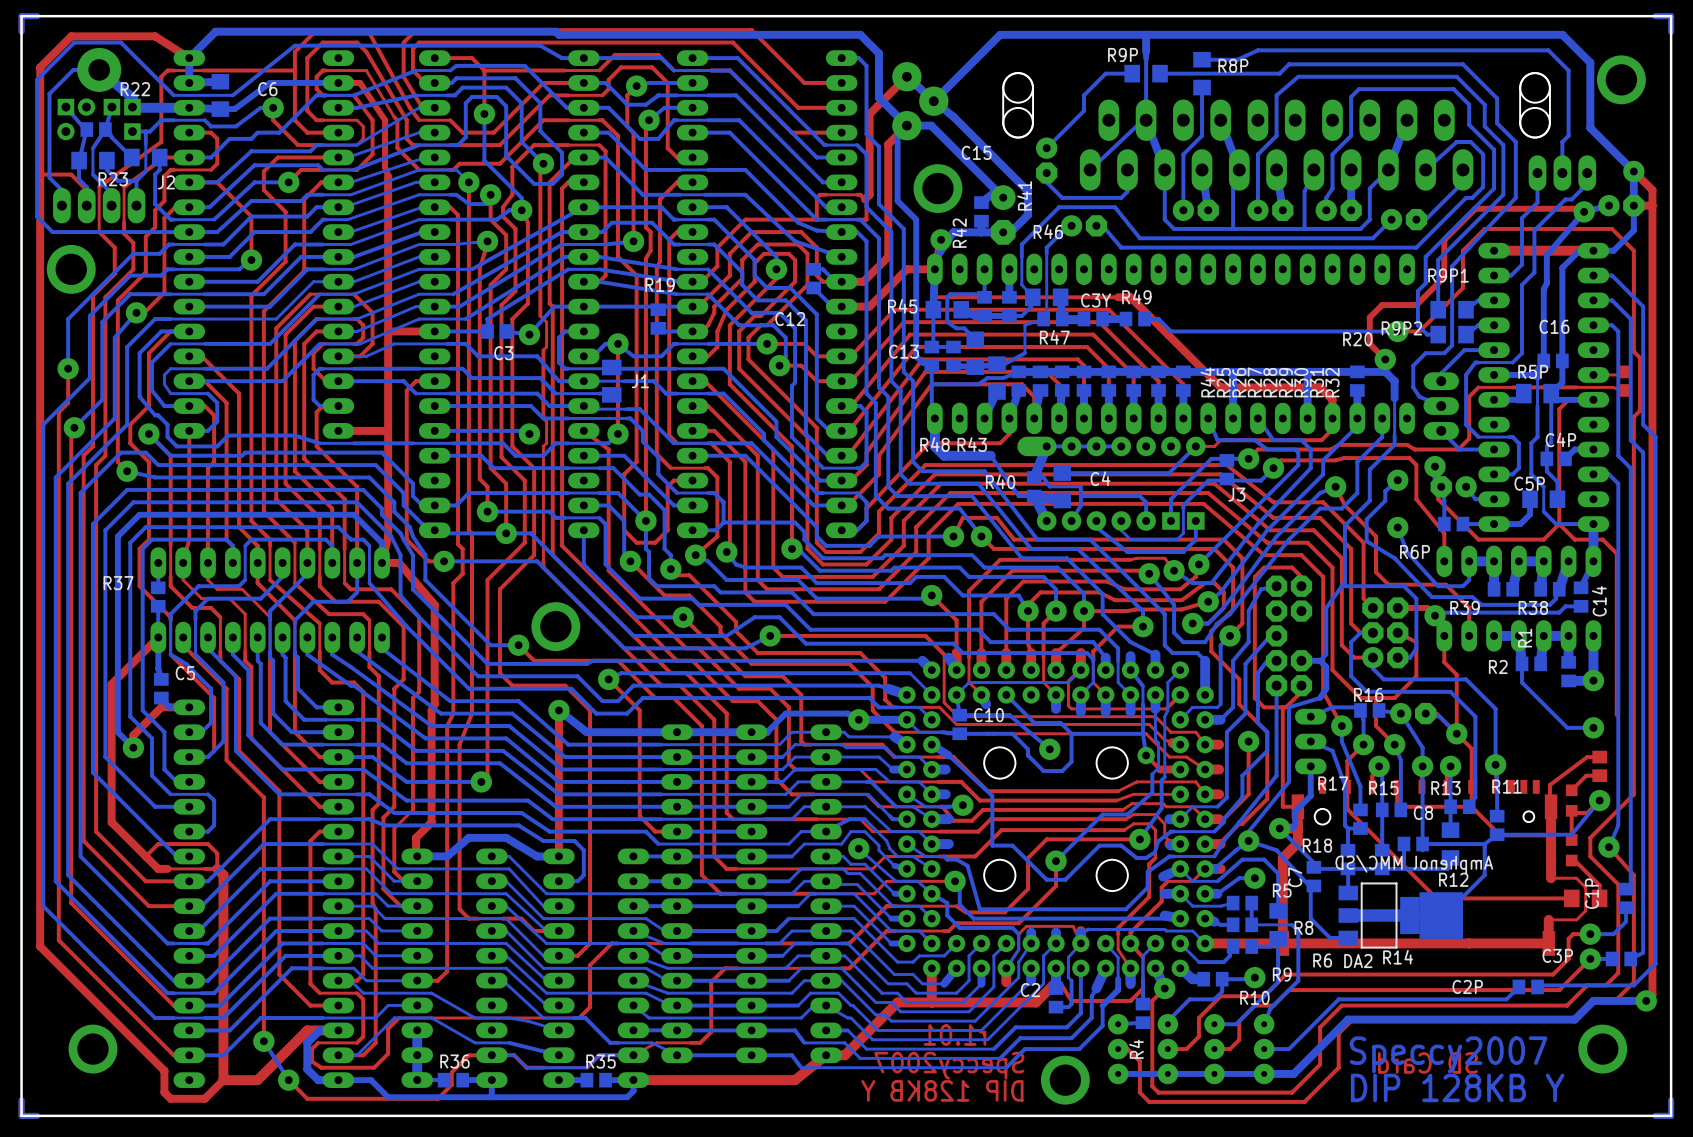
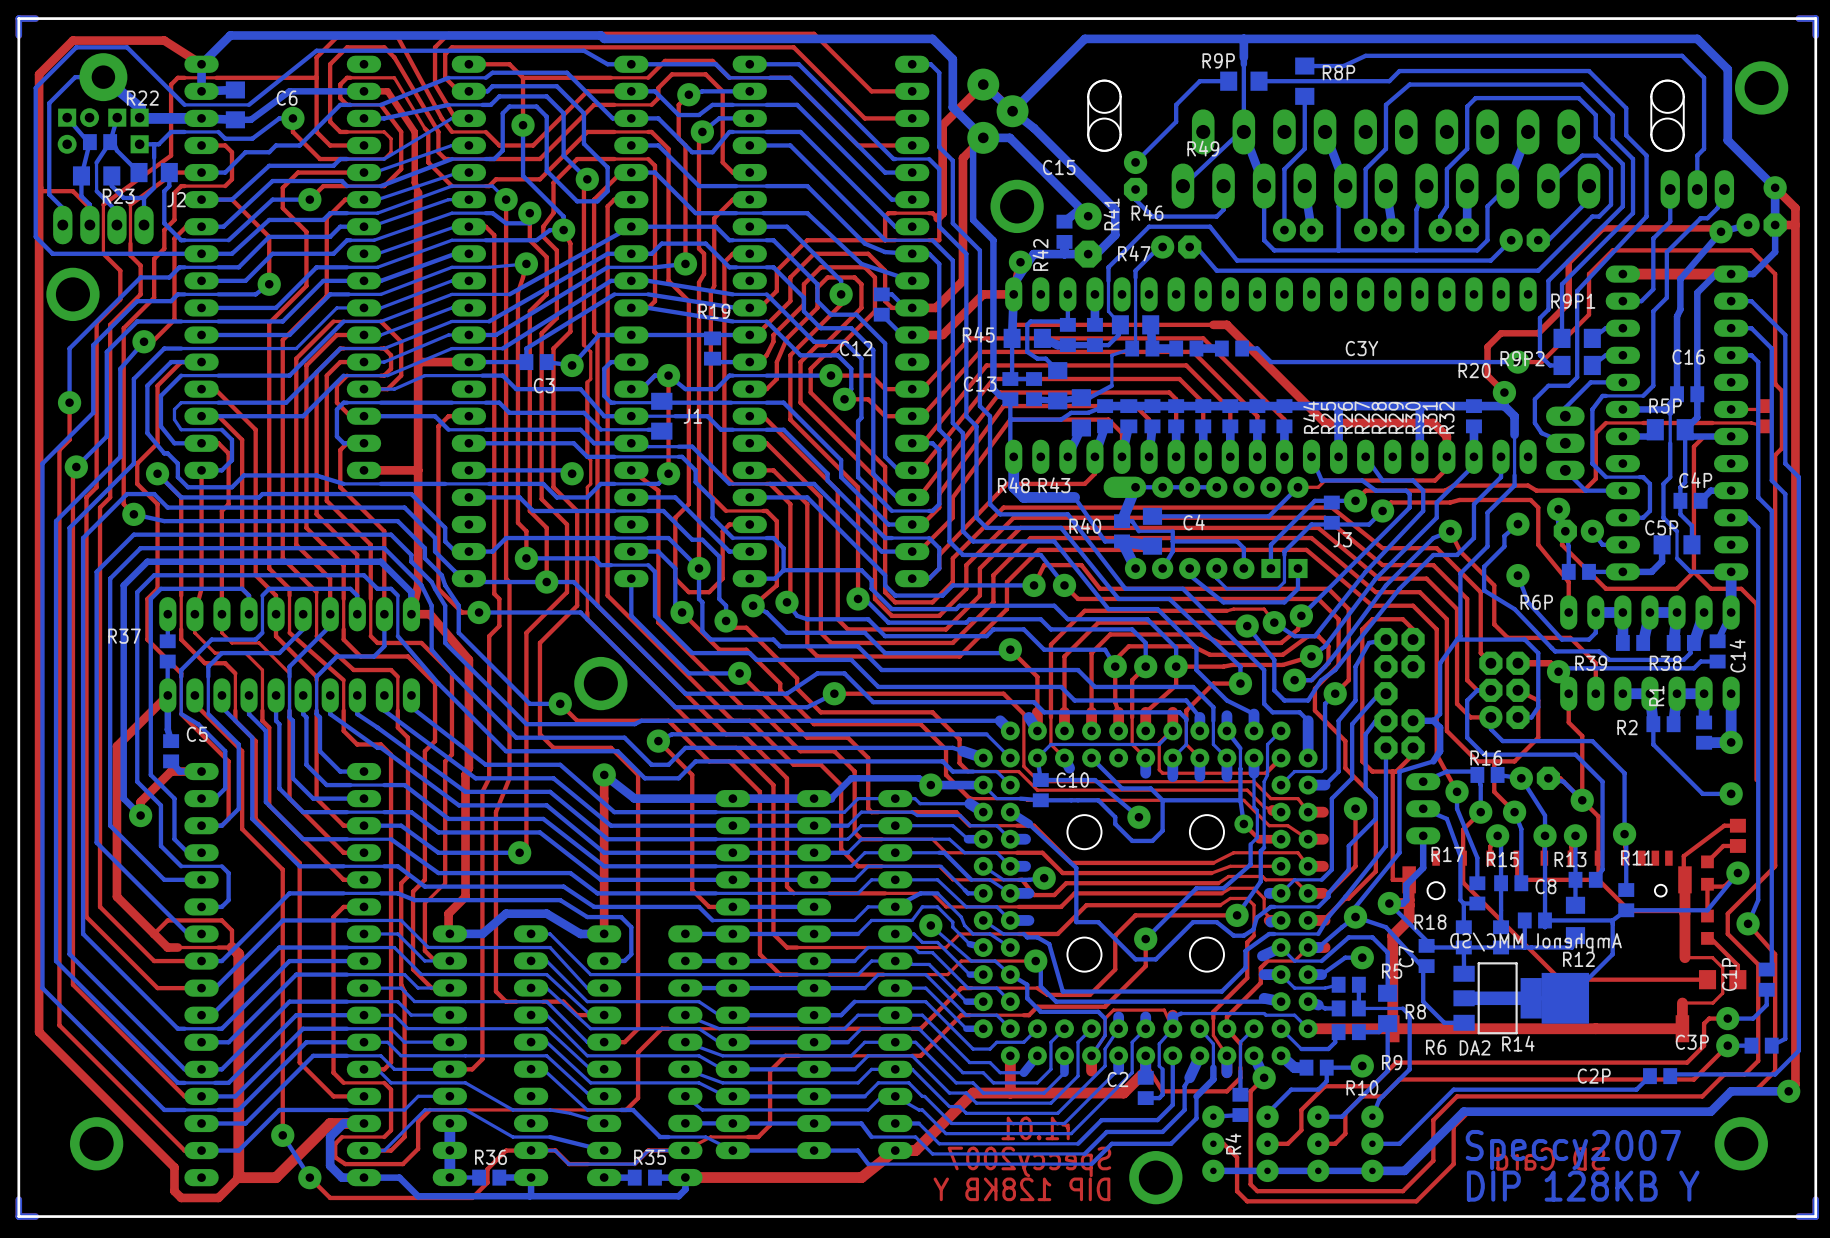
R46 name position: R46 (1048, 231) -> R46 (1147, 212)
R49 name position: R49 (1136, 297) -> R49 (1203, 148)
C3Y name position: C3Y (1096, 300) -> C3Y (1361, 348)
R47 name position: R47 (1054, 337) -> R47 (1134, 253)

